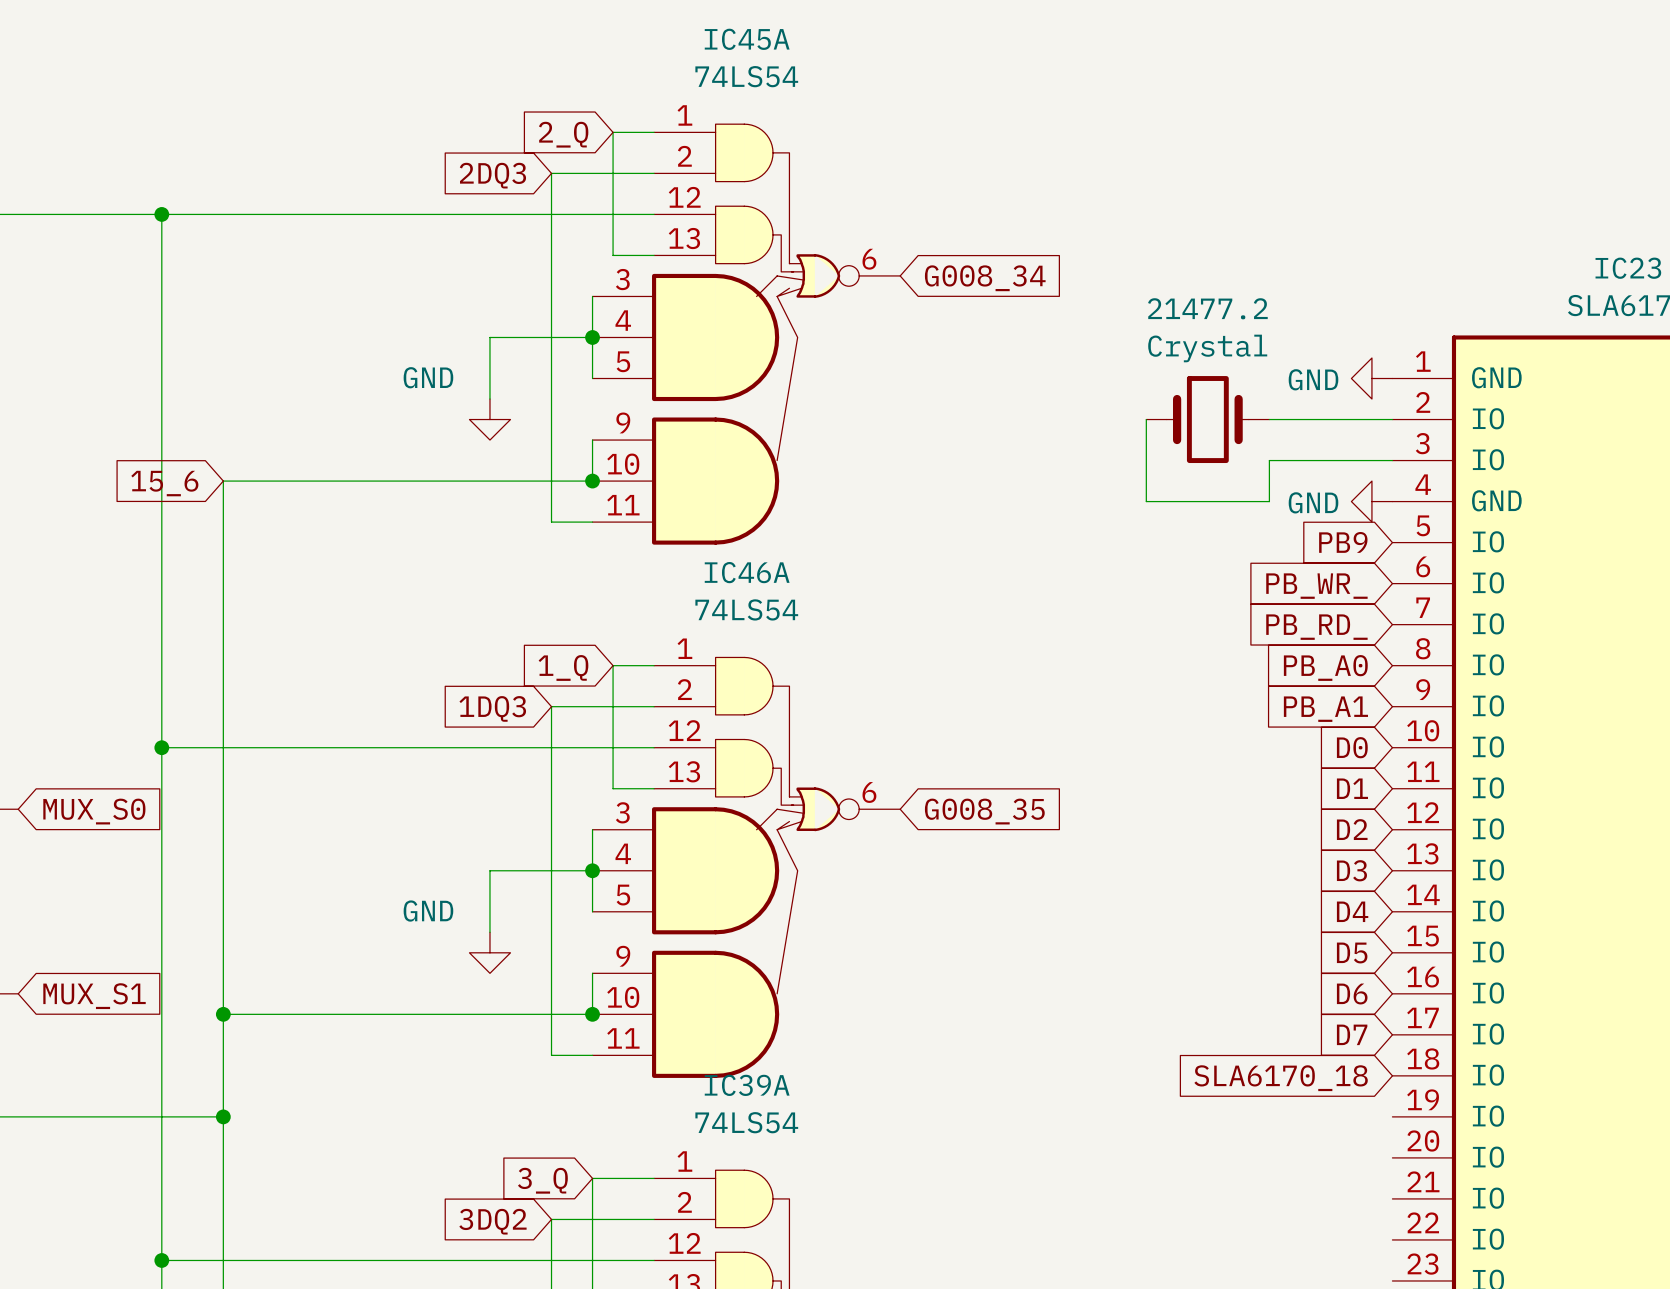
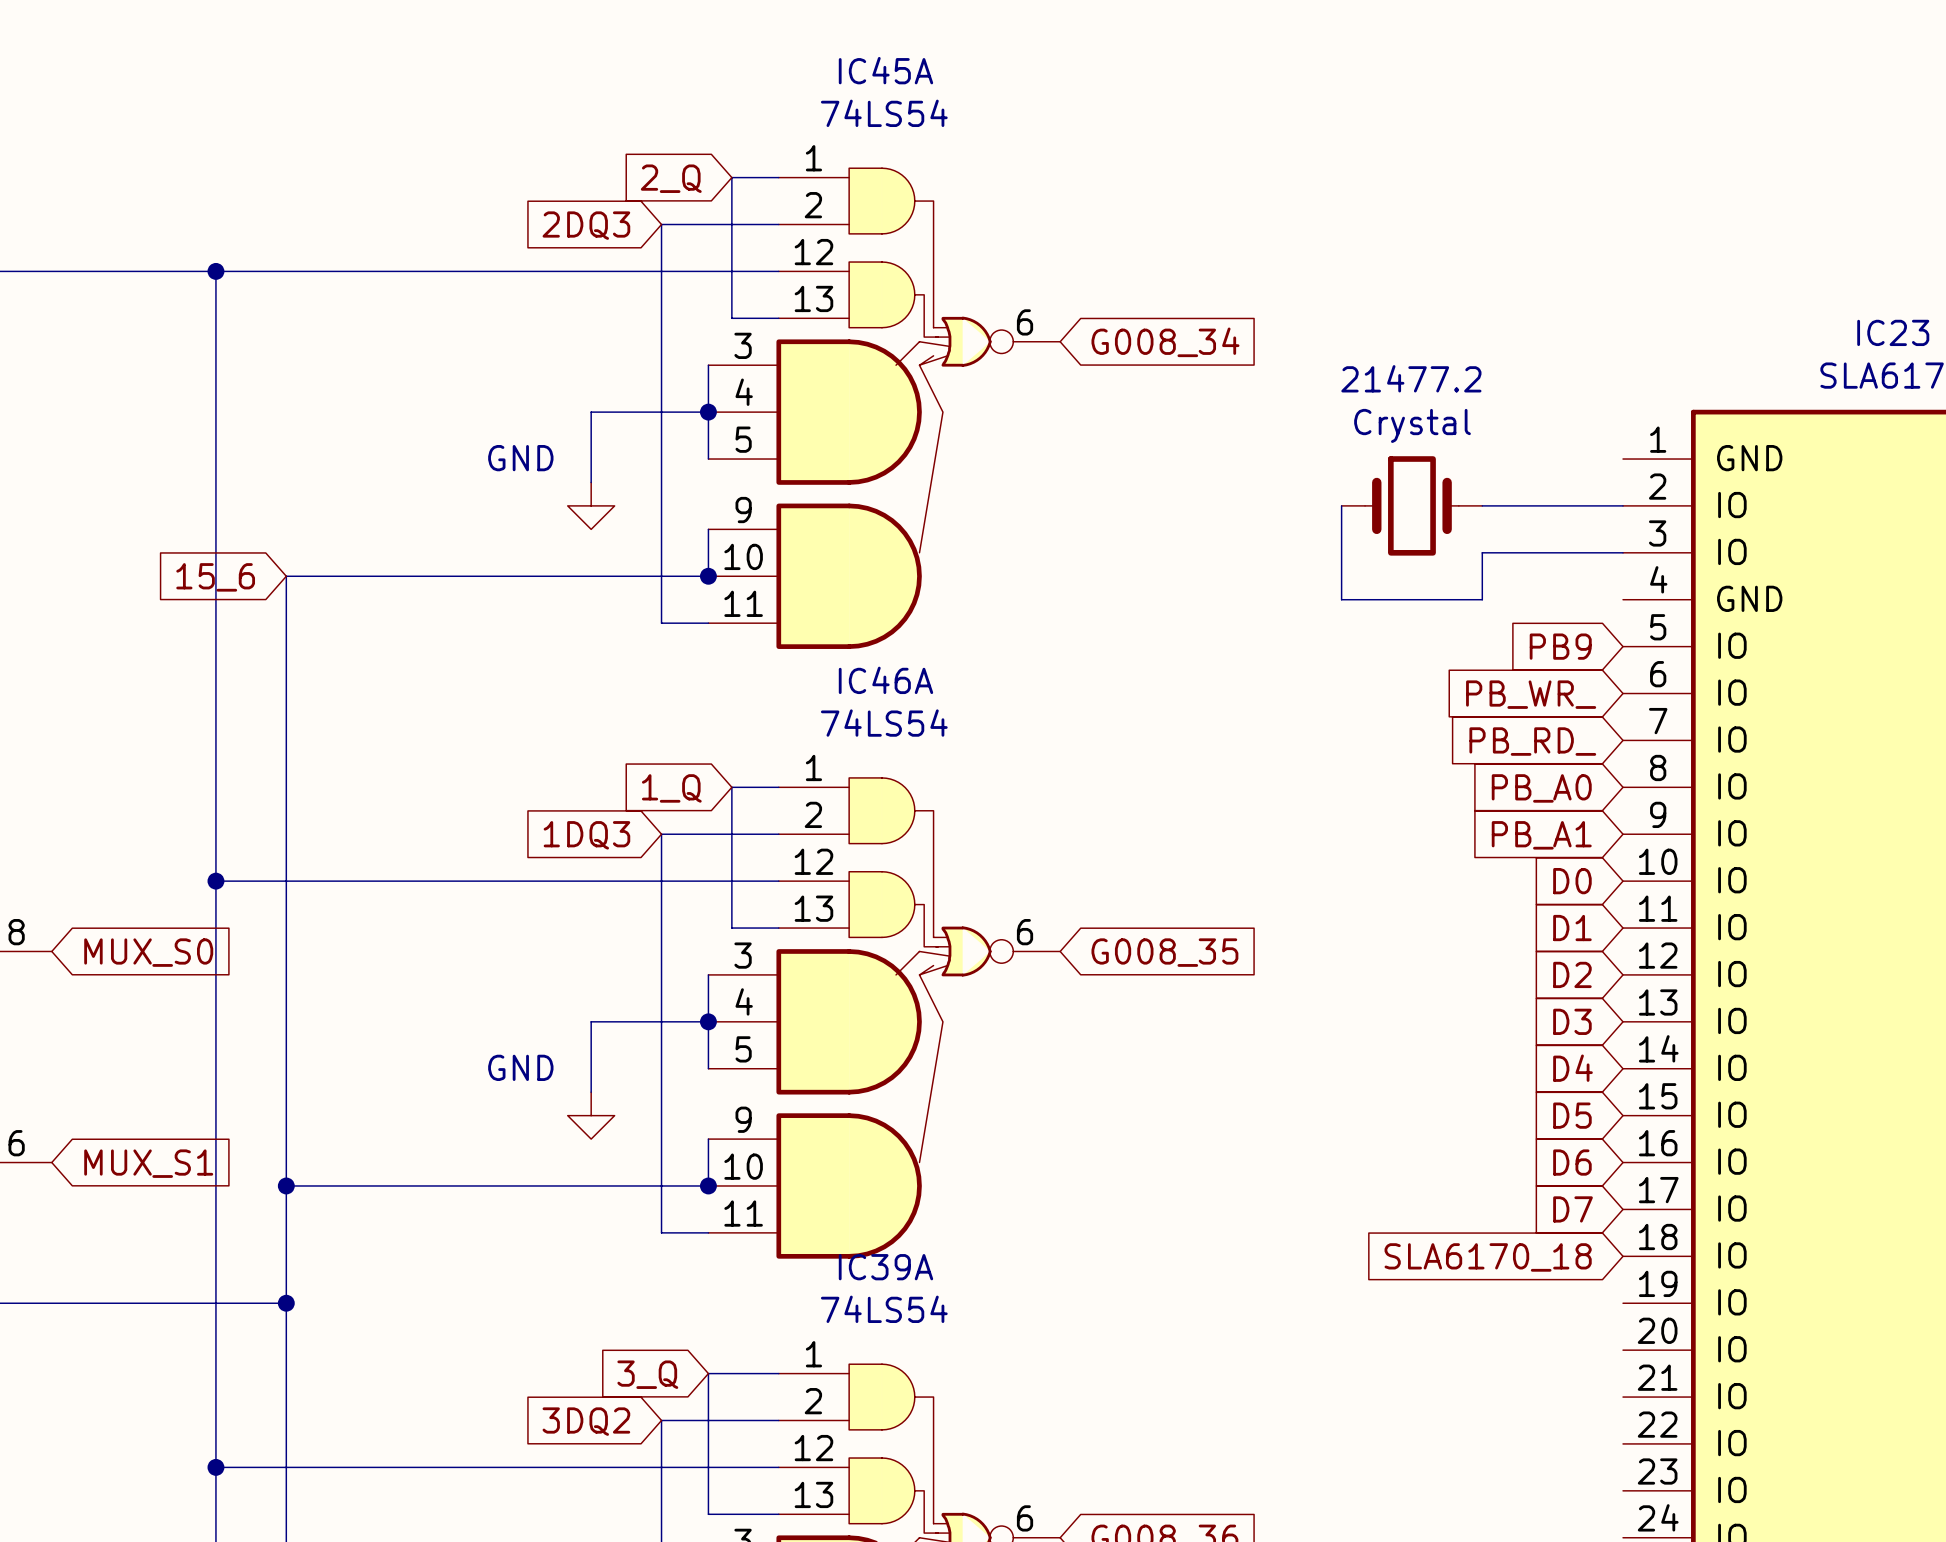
power symbol: GND (1371, 378) -> none
power symbol: GND (1371, 501) -> none

